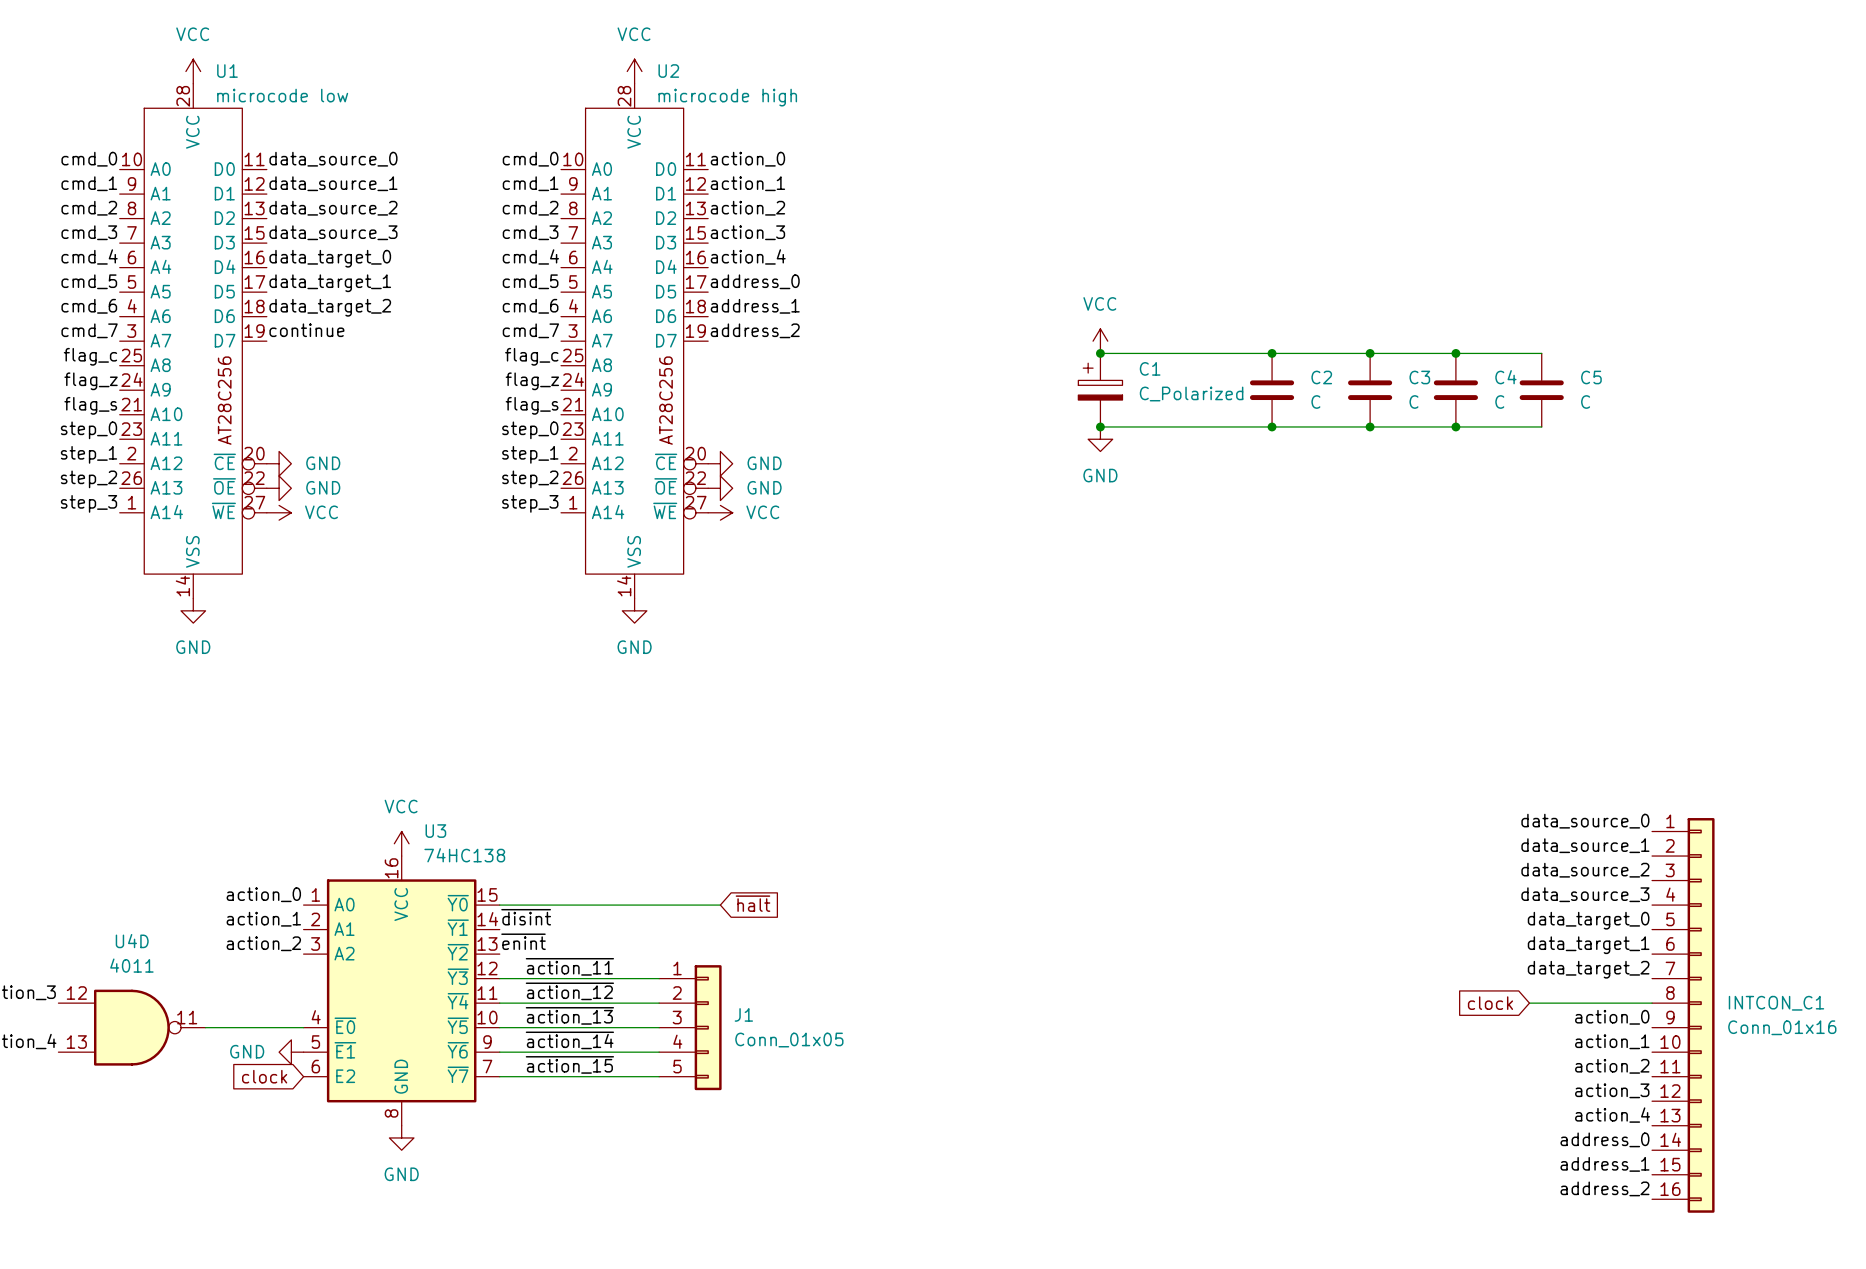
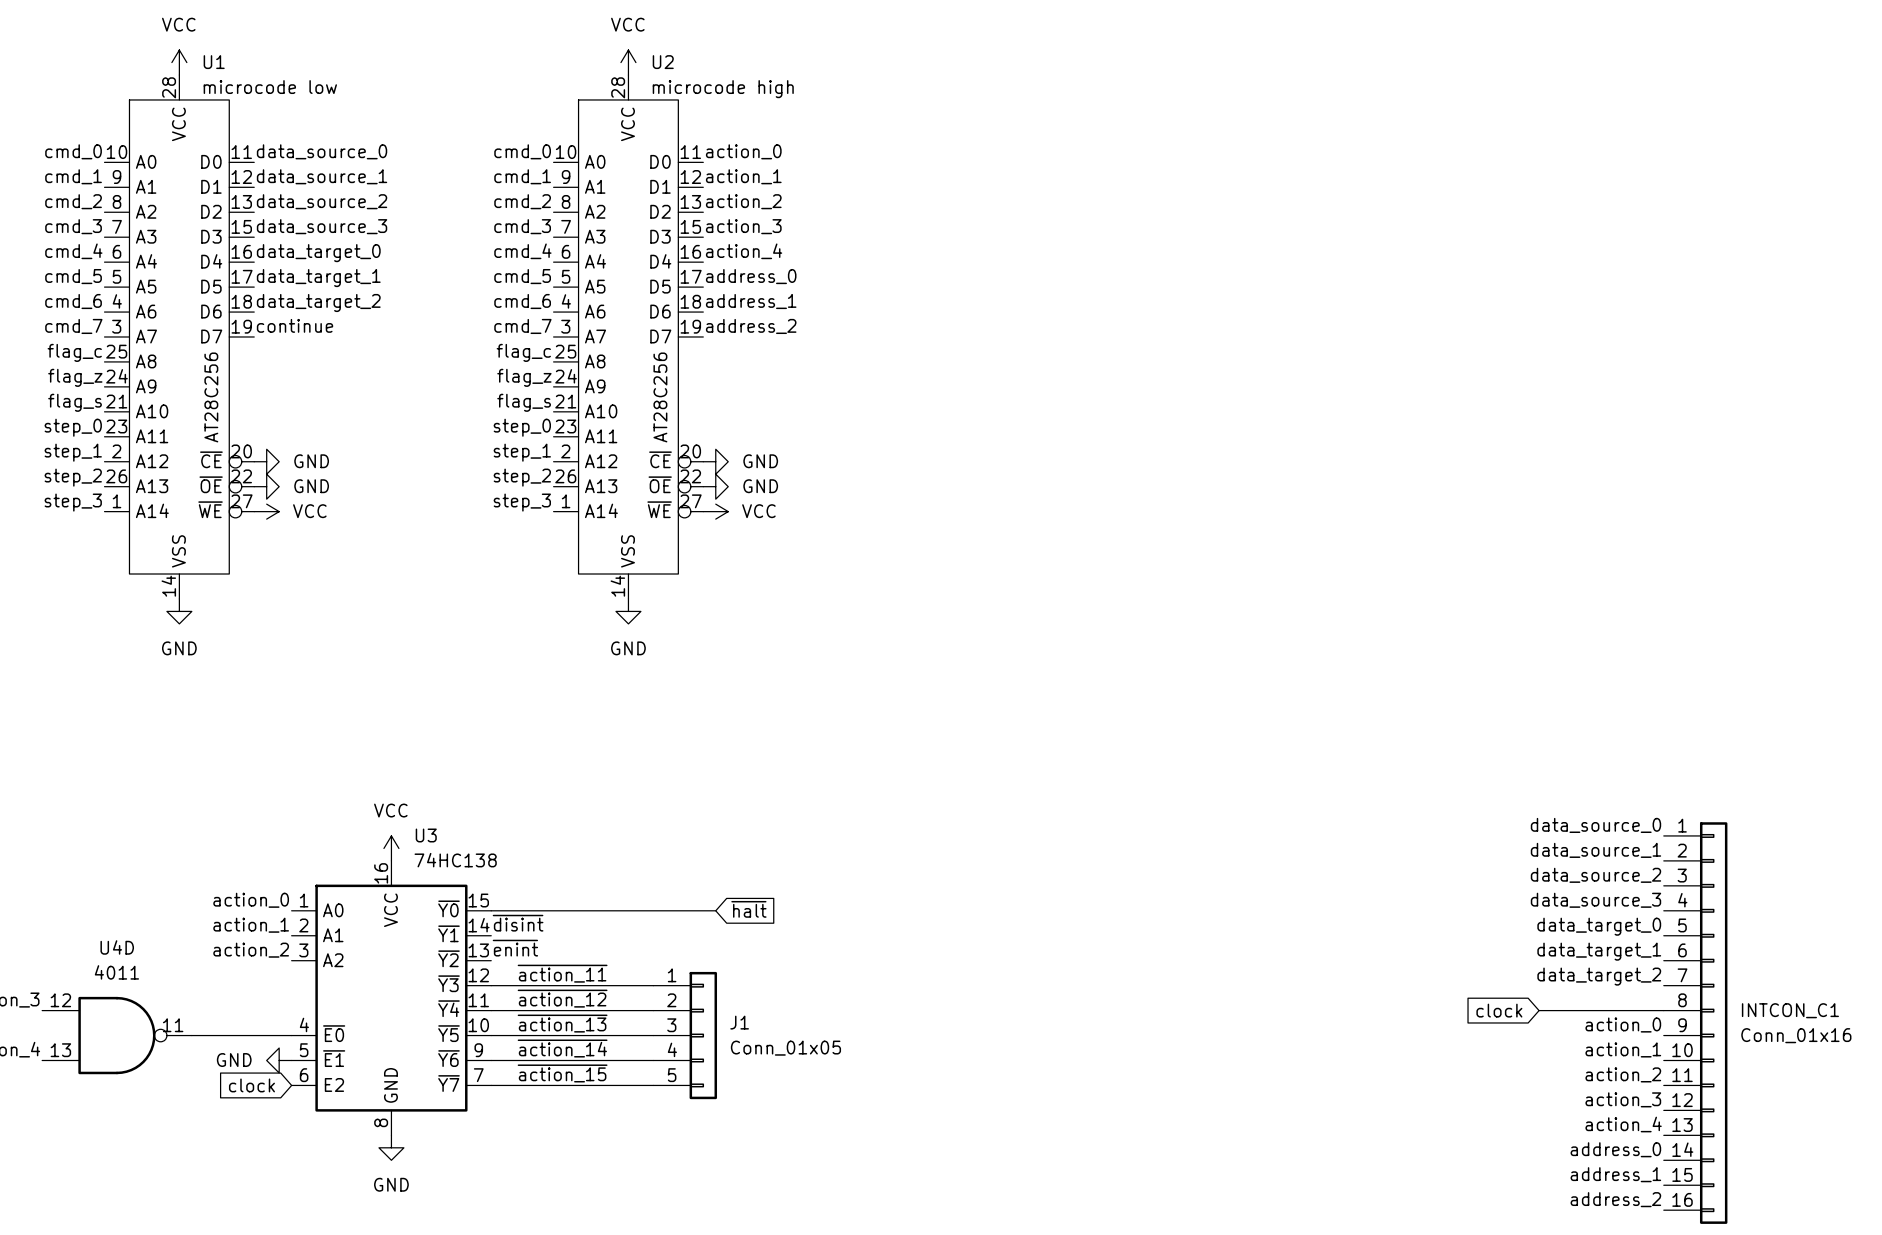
power symbol: VCC (1100, 341) -> none
wire: (1100, 353) (1541, 353) -> none
junction: (1100, 353) -> none
junction: (1272, 353) -> none
junction: (1370, 353) -> none
junction: (1455, 353) -> none
C1: C_Polarized (1100, 390) -> none
C2: C (1272, 390) -> none
C3: C (1370, 390) -> none
C4: C (1455, 390) -> none
C5: C (1541, 390) -> none
wire: (1100, 426) (1541, 426) -> none
junction: (1100, 426) -> none
junction: (1272, 426) -> none
junction: (1370, 426) -> none
junction: (1455, 426) -> none
power symbol: GND (1100, 439) -> none

